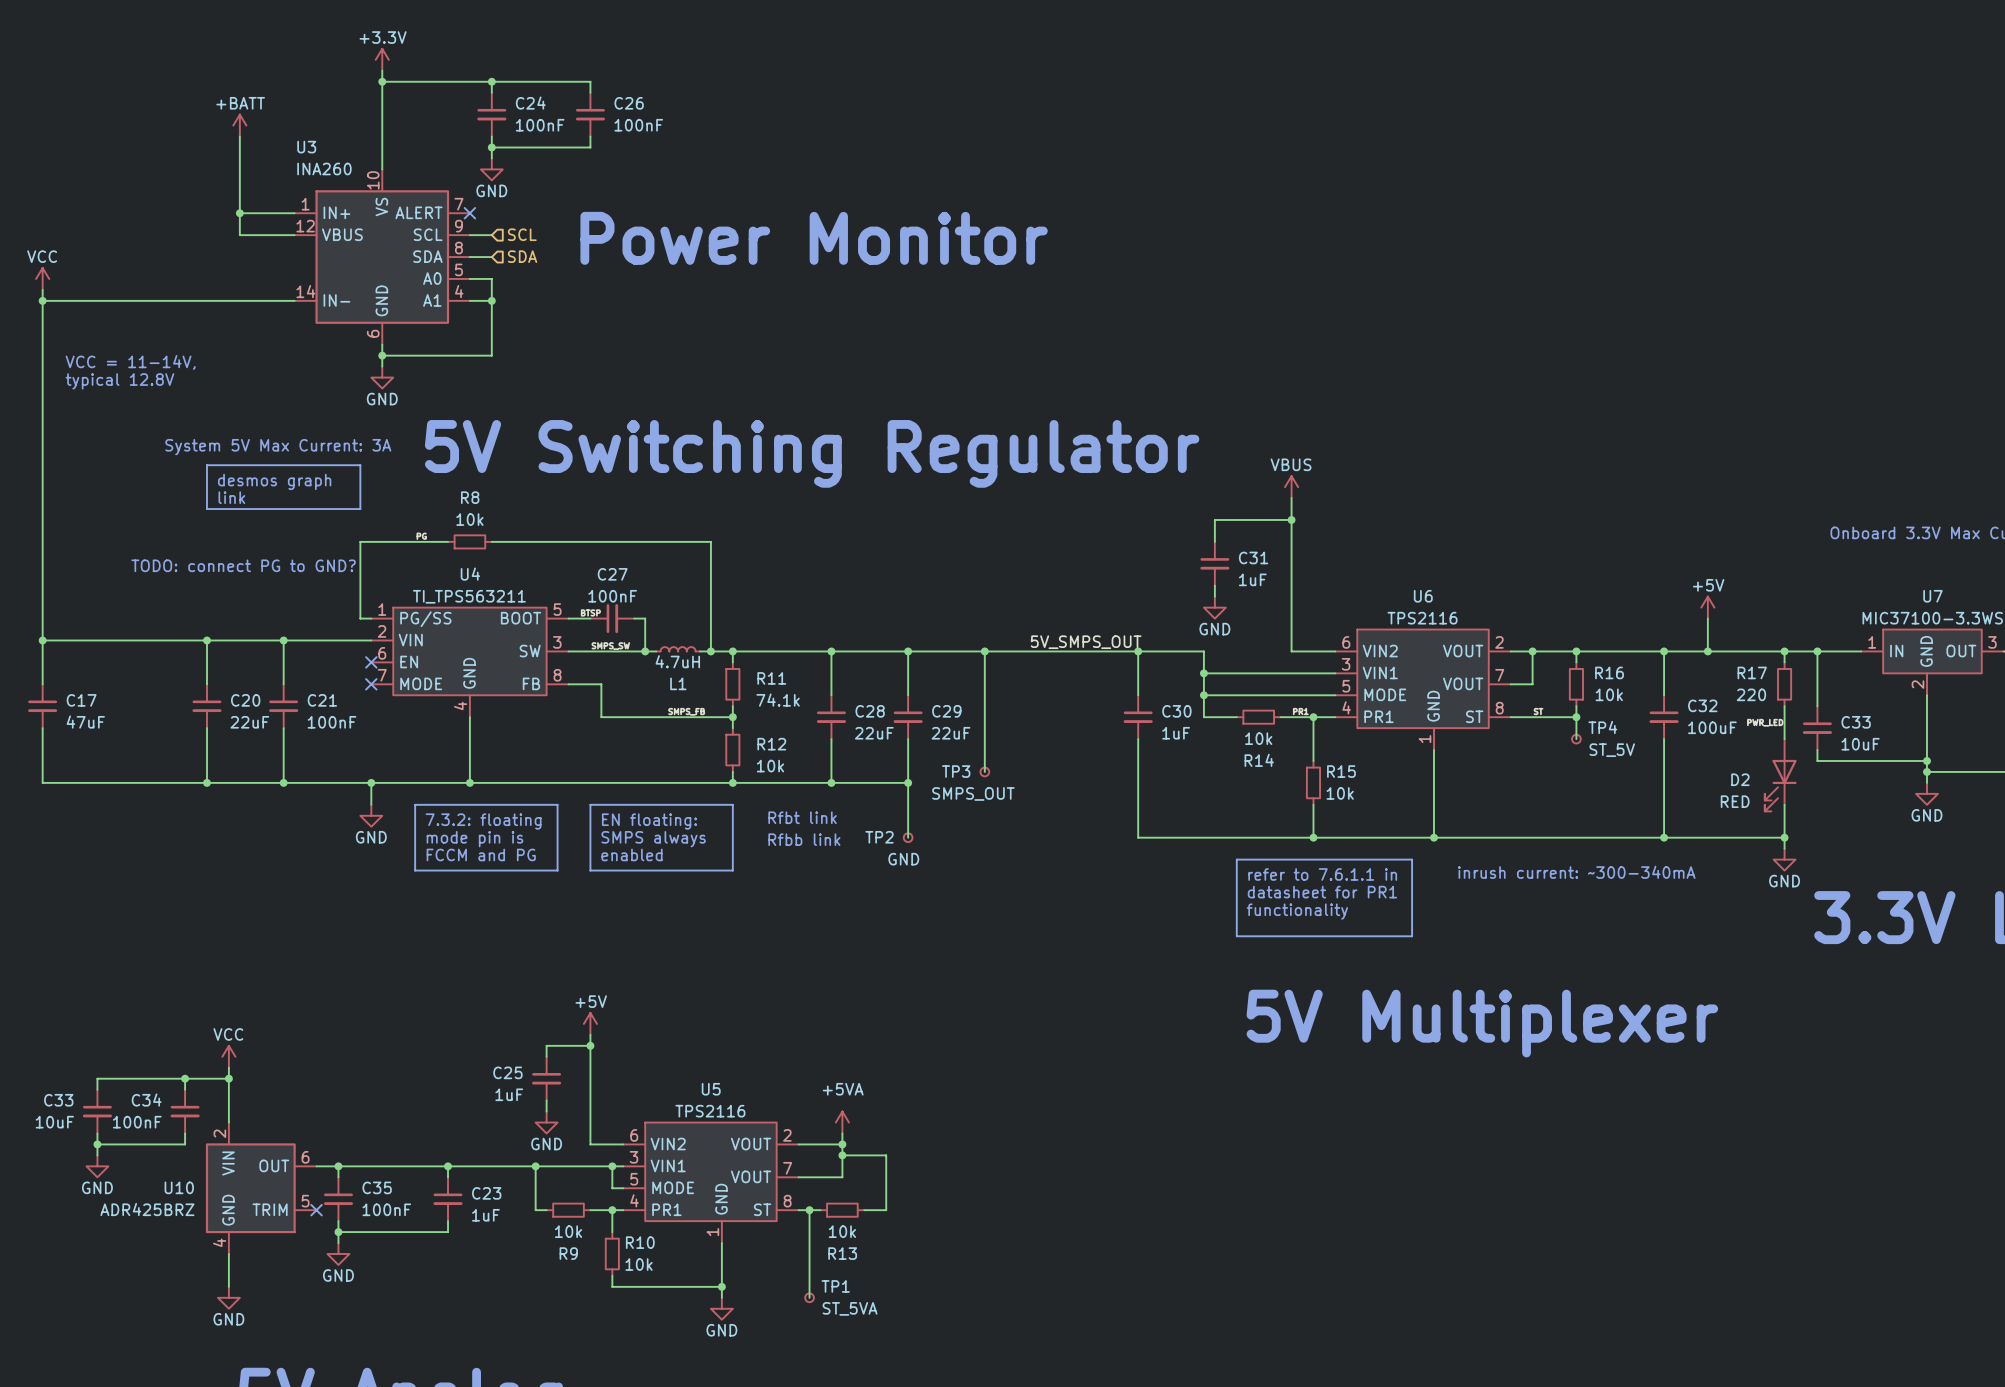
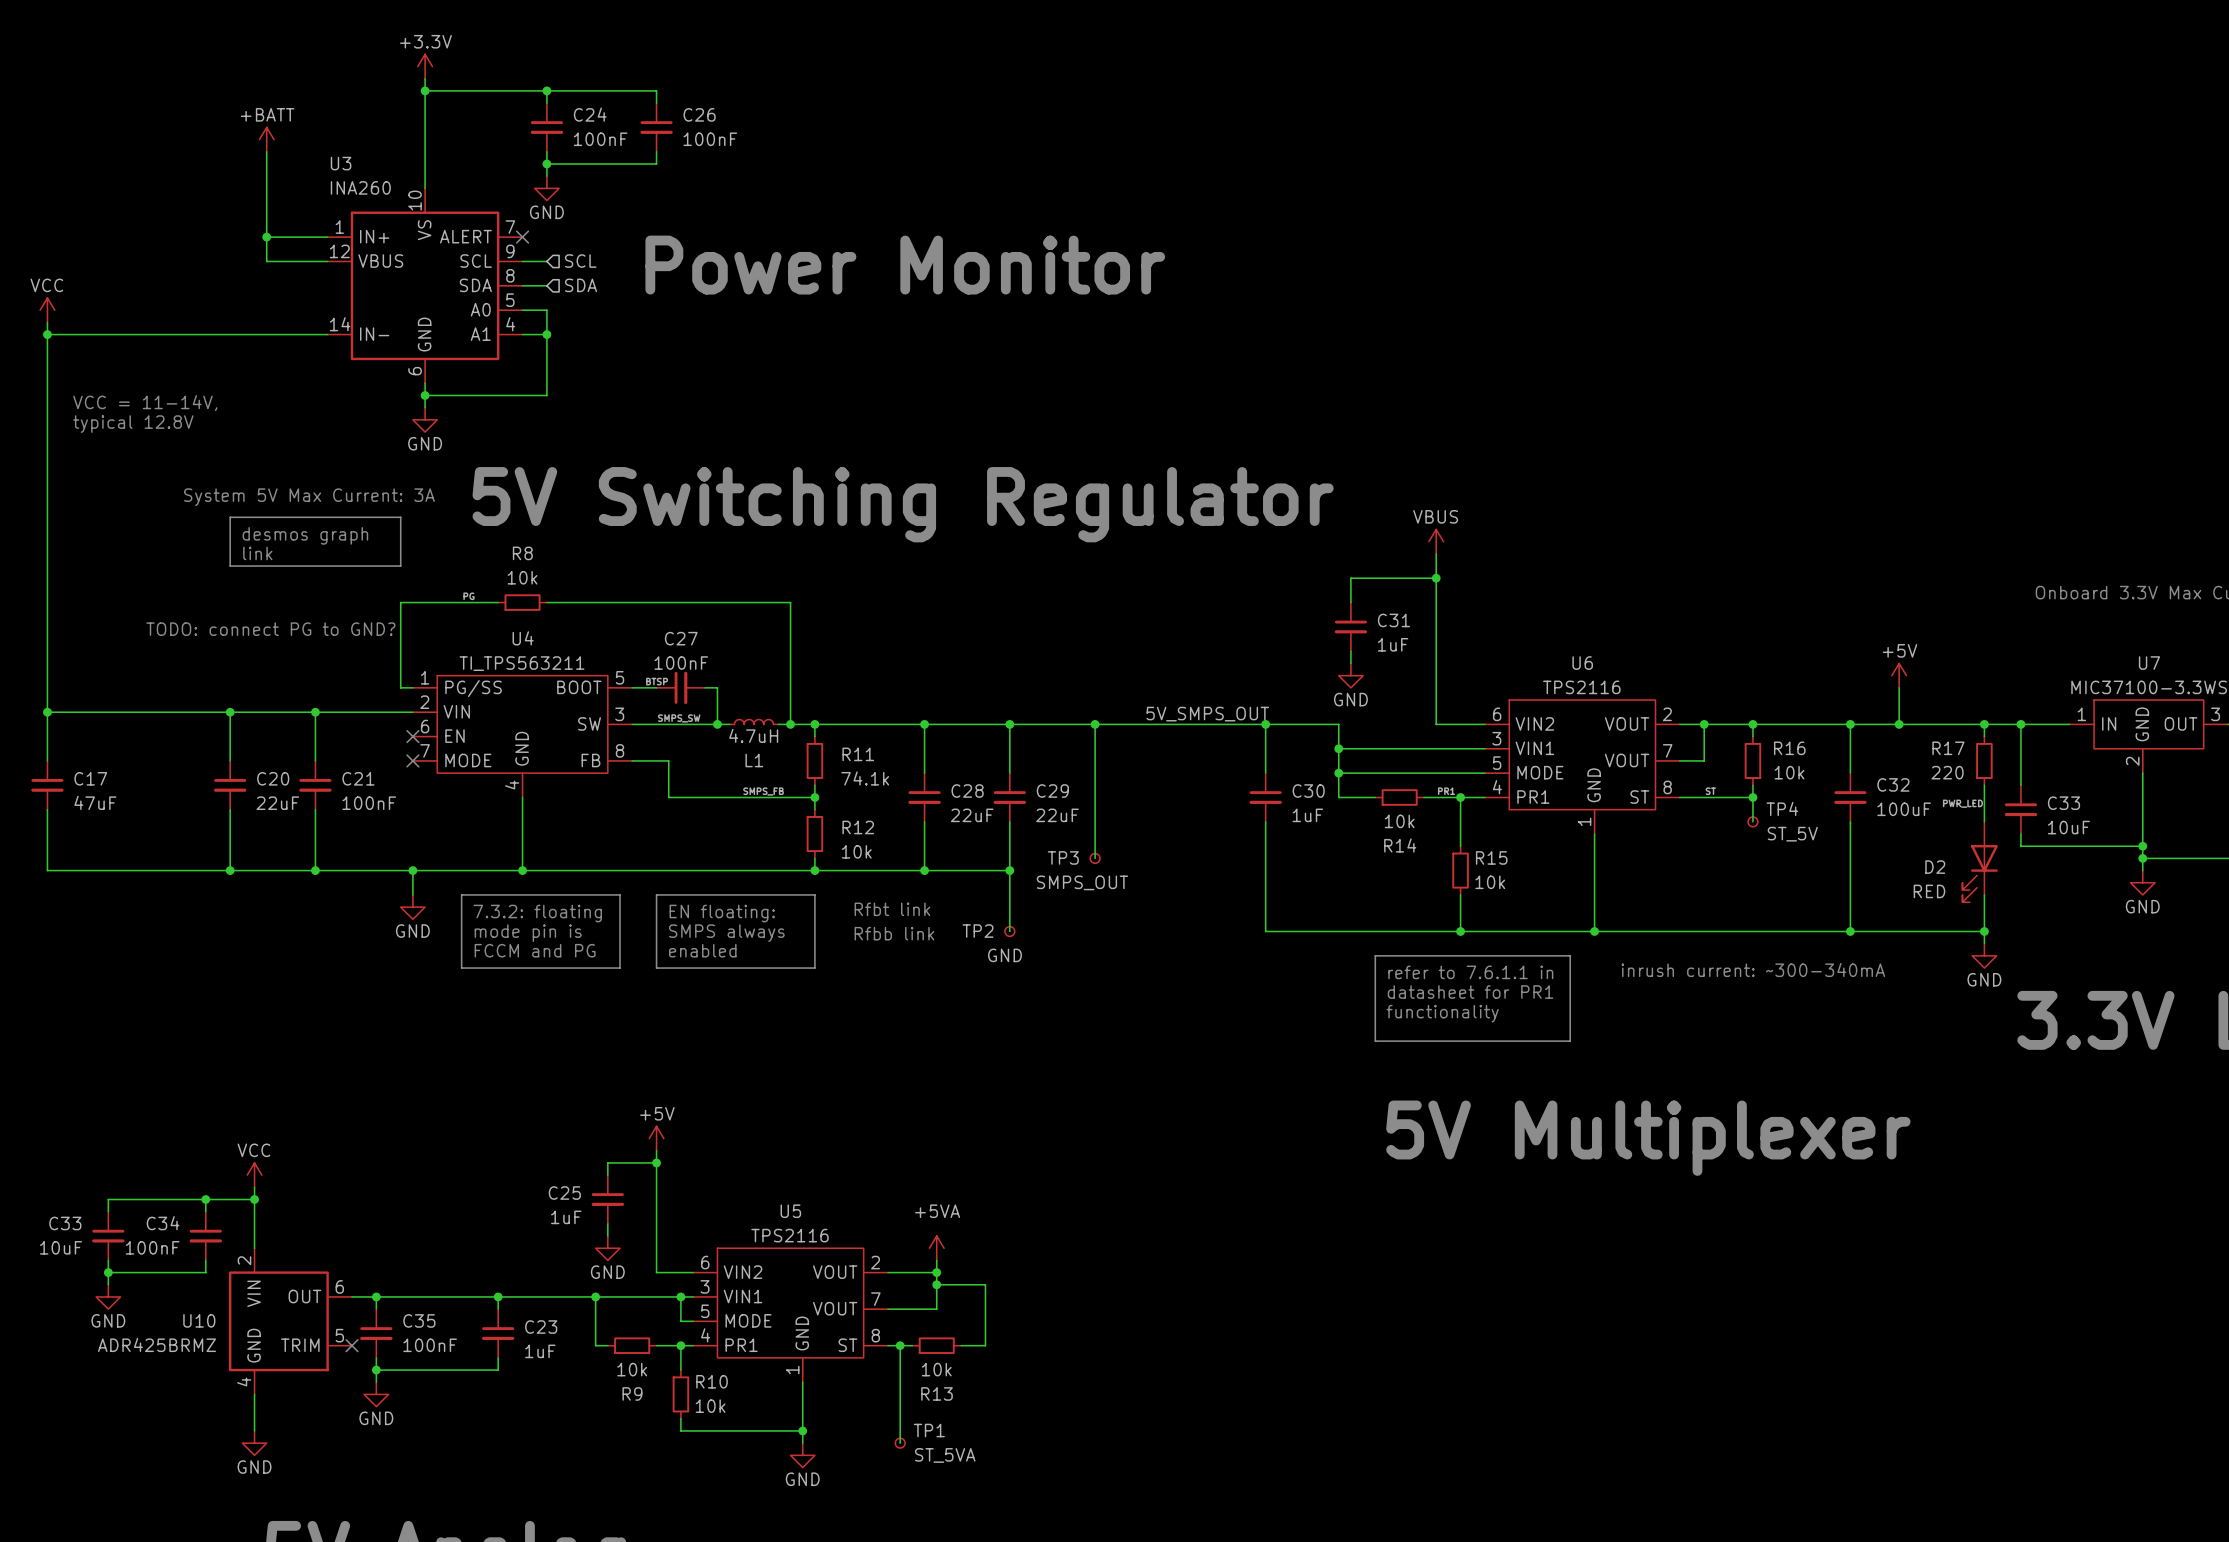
U10 value: ADR425BRZ (147, 1209) -> ADR425BRMZ (156, 1344)

